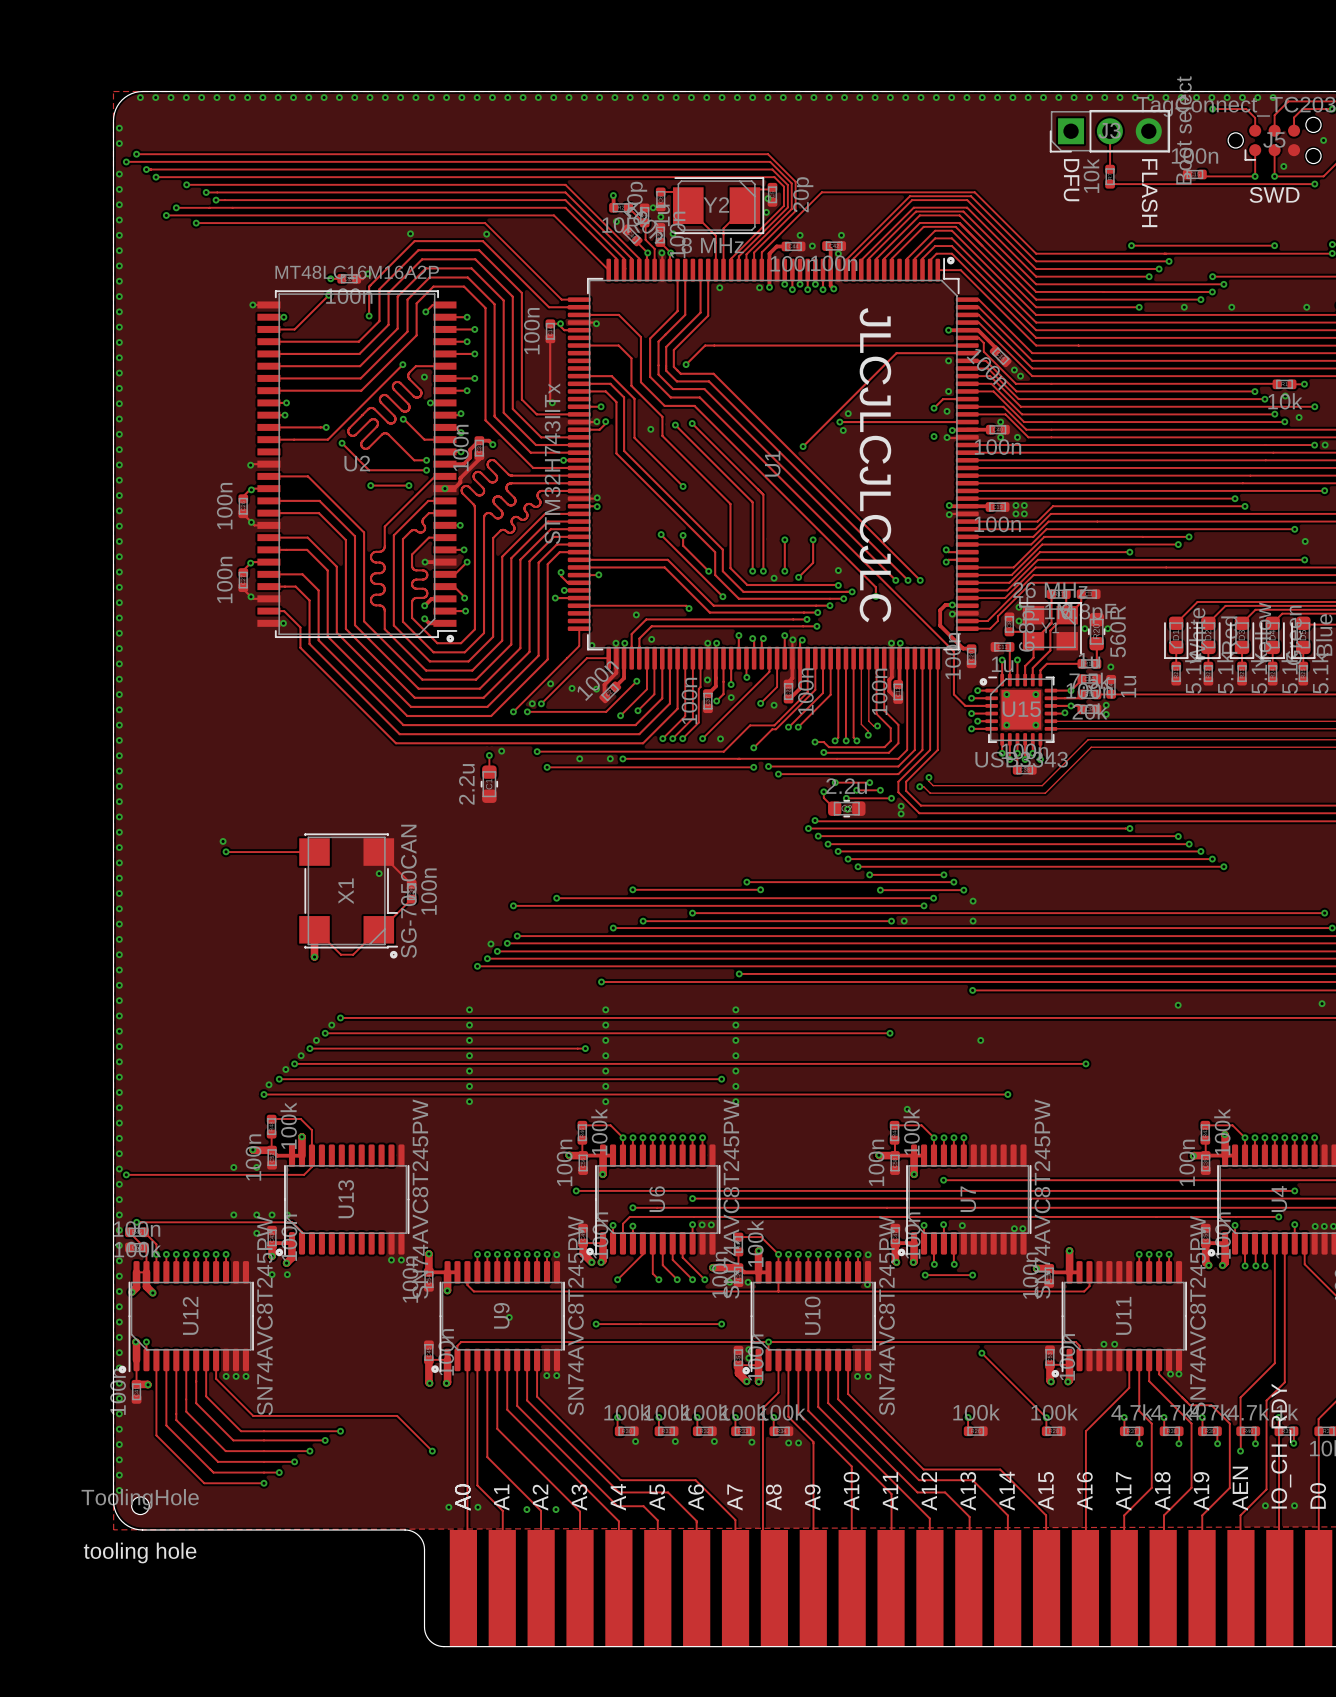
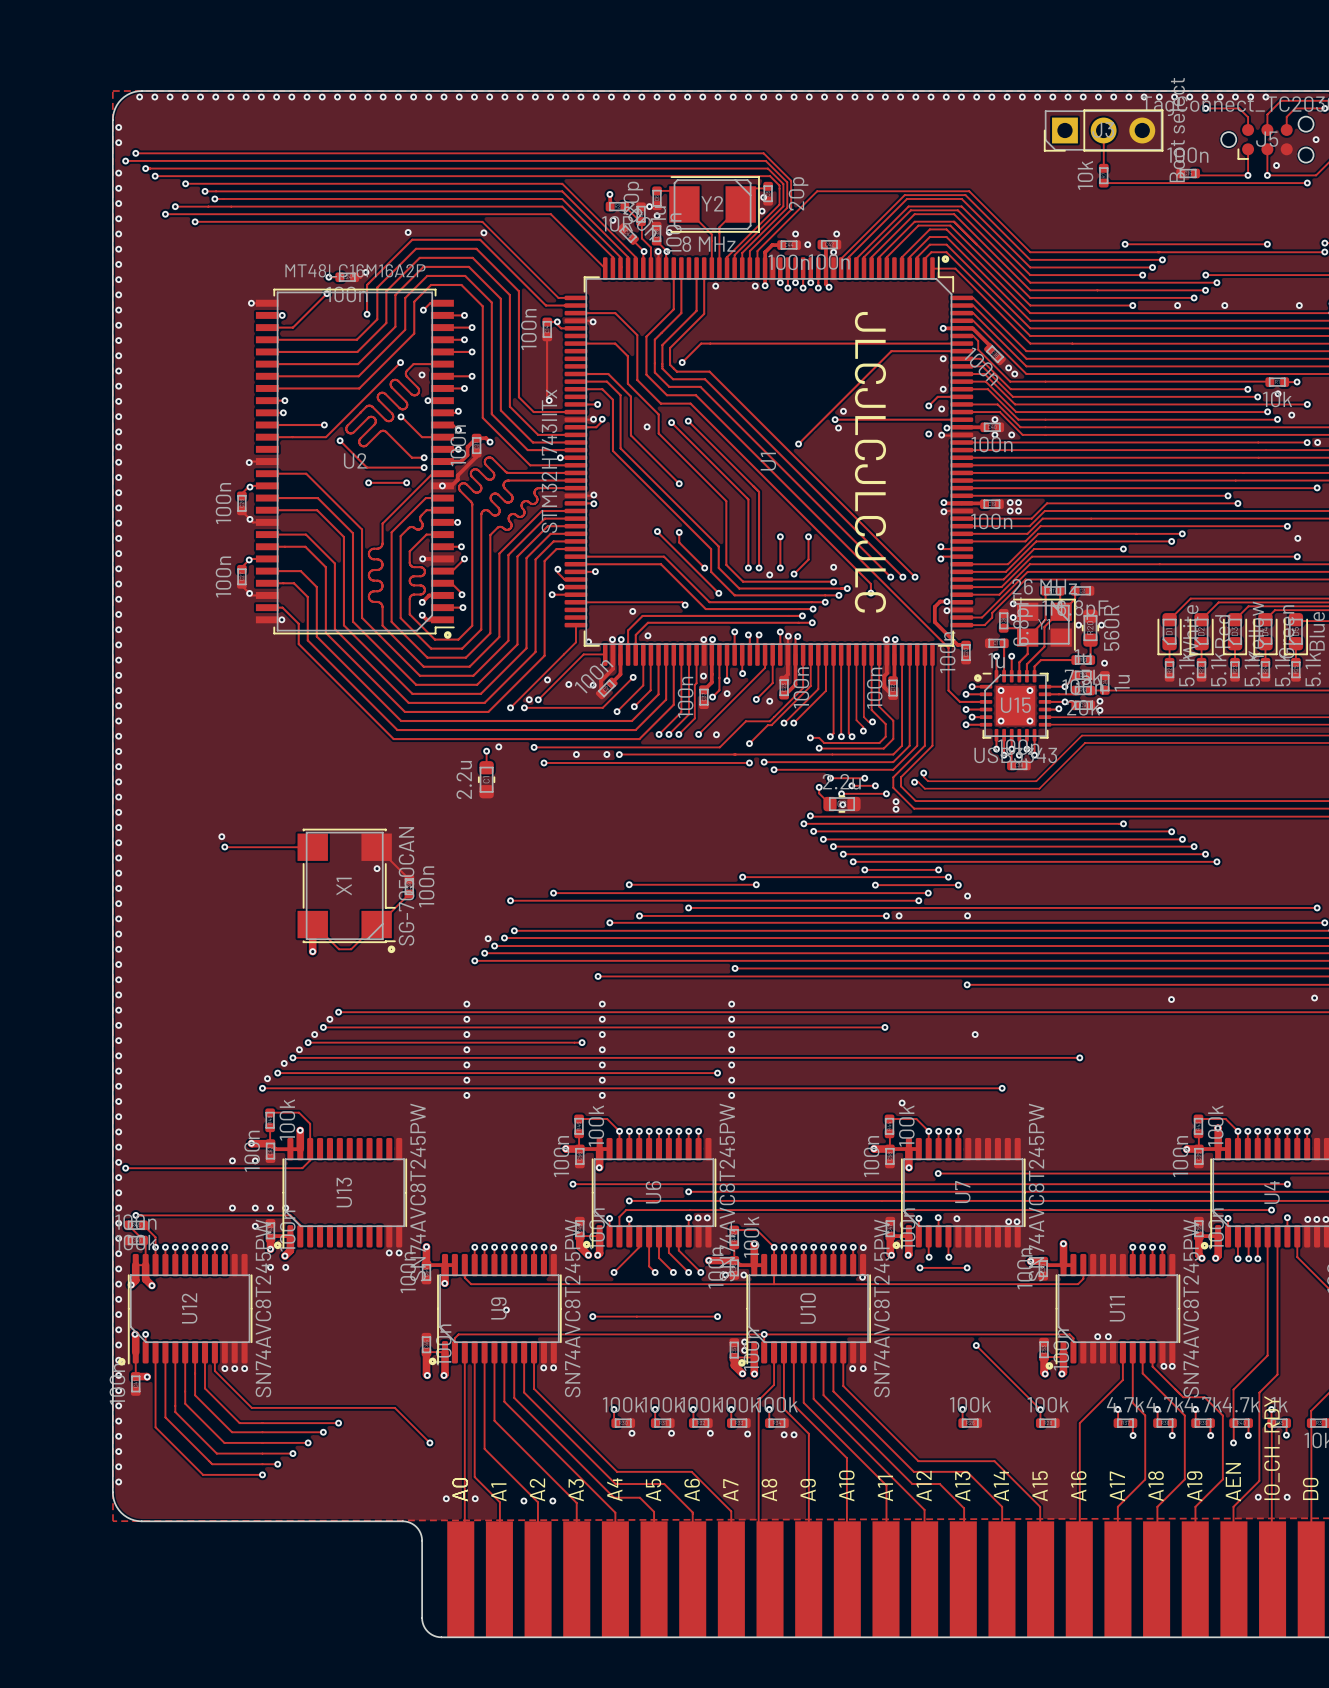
text: DFU (1071, 180) -> none
text: FLASH (1149, 193) -> none
text: SWD (1274, 194) -> none
part: ToolingHole (140, 1505) -> none

